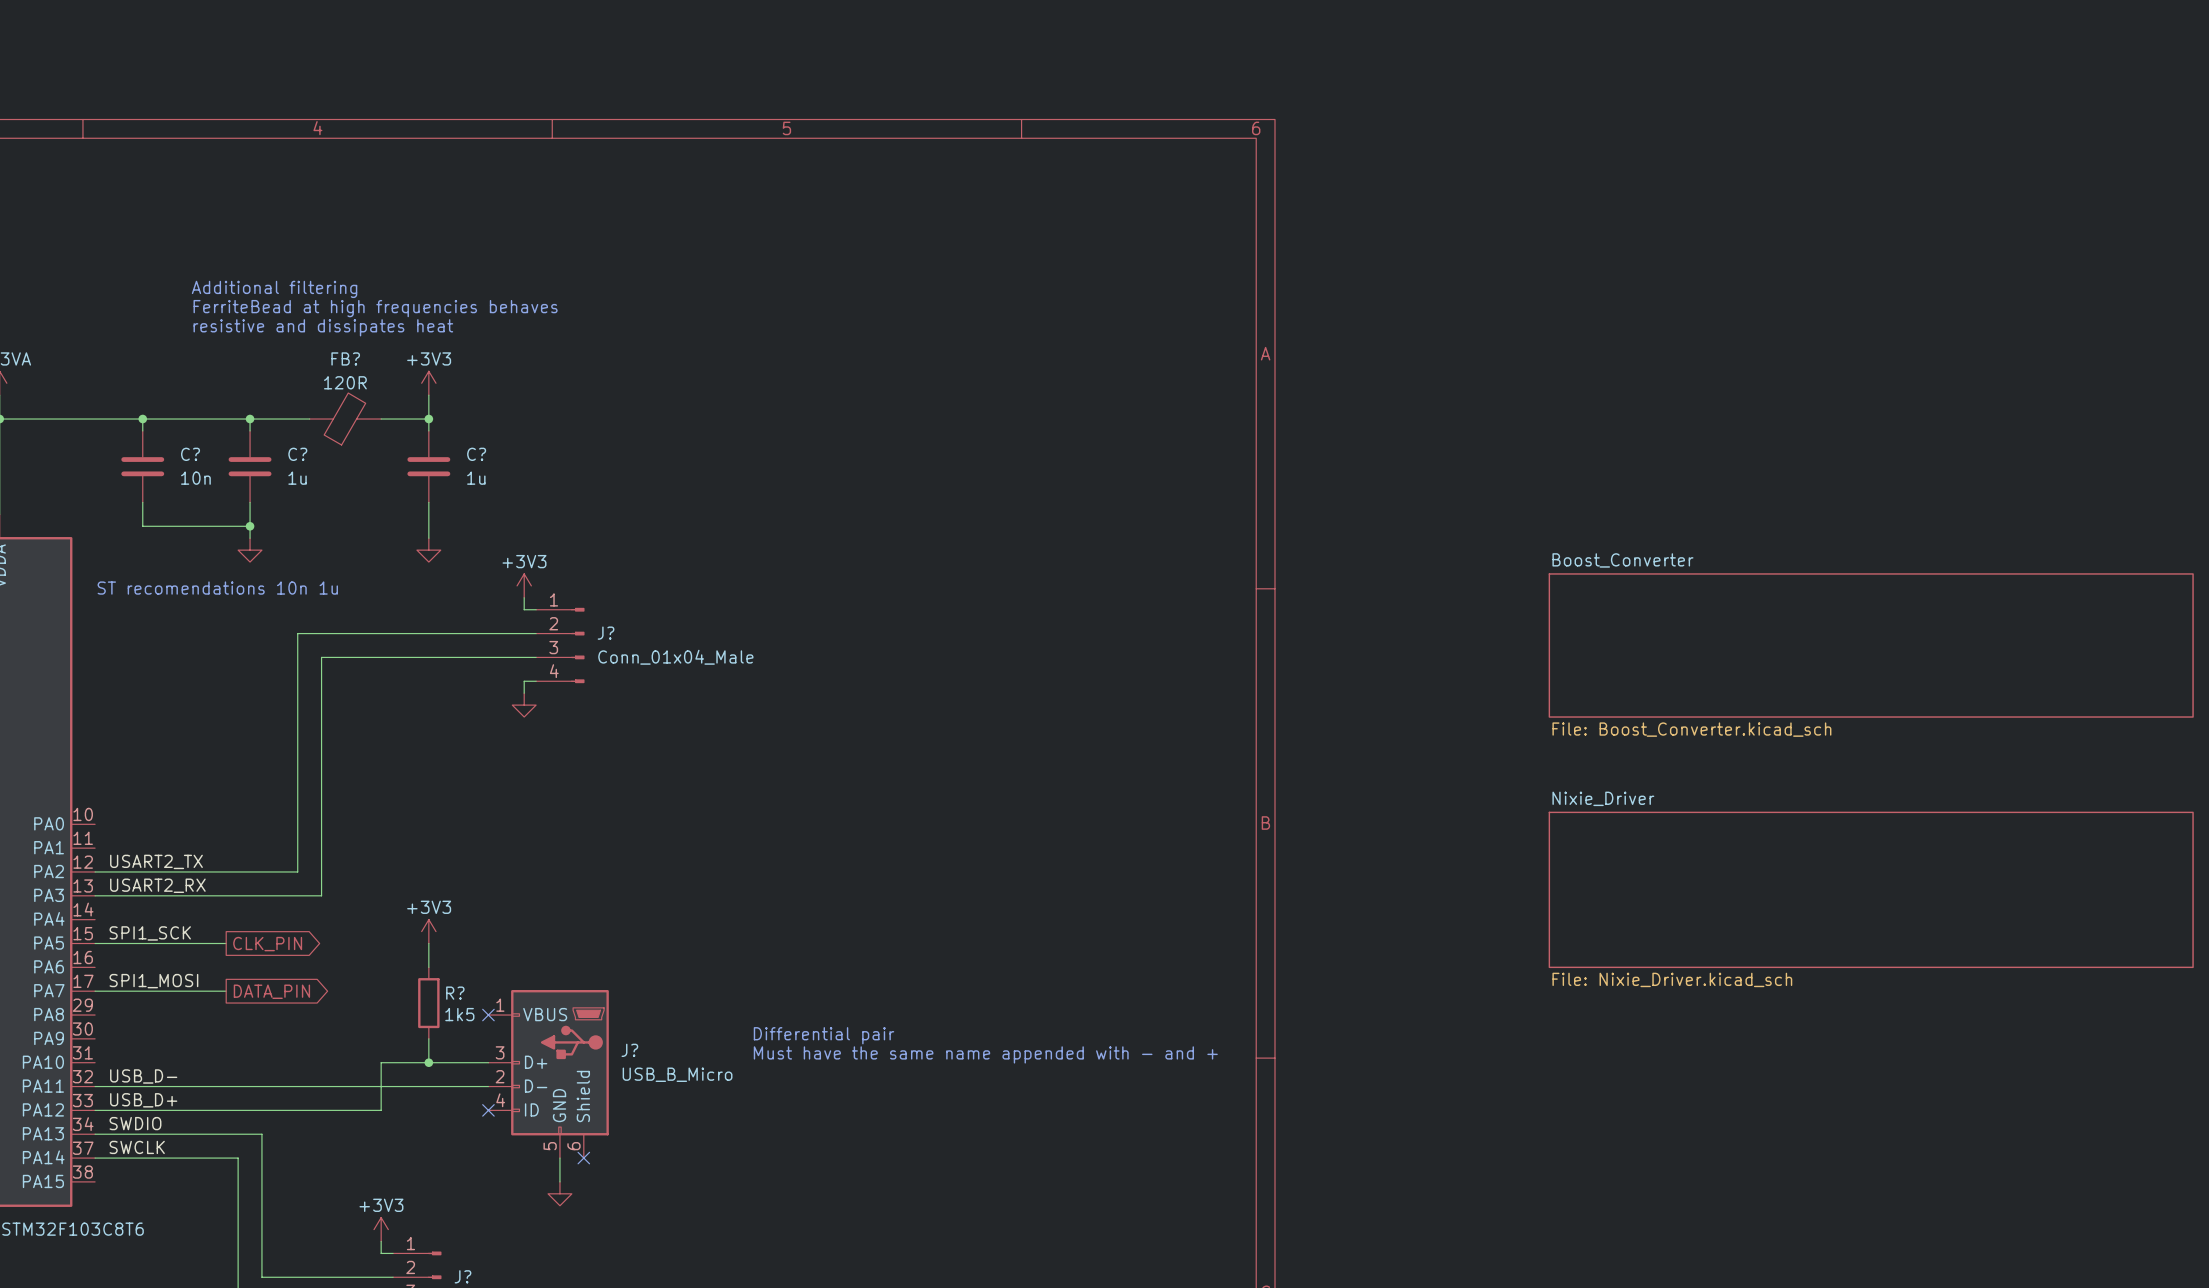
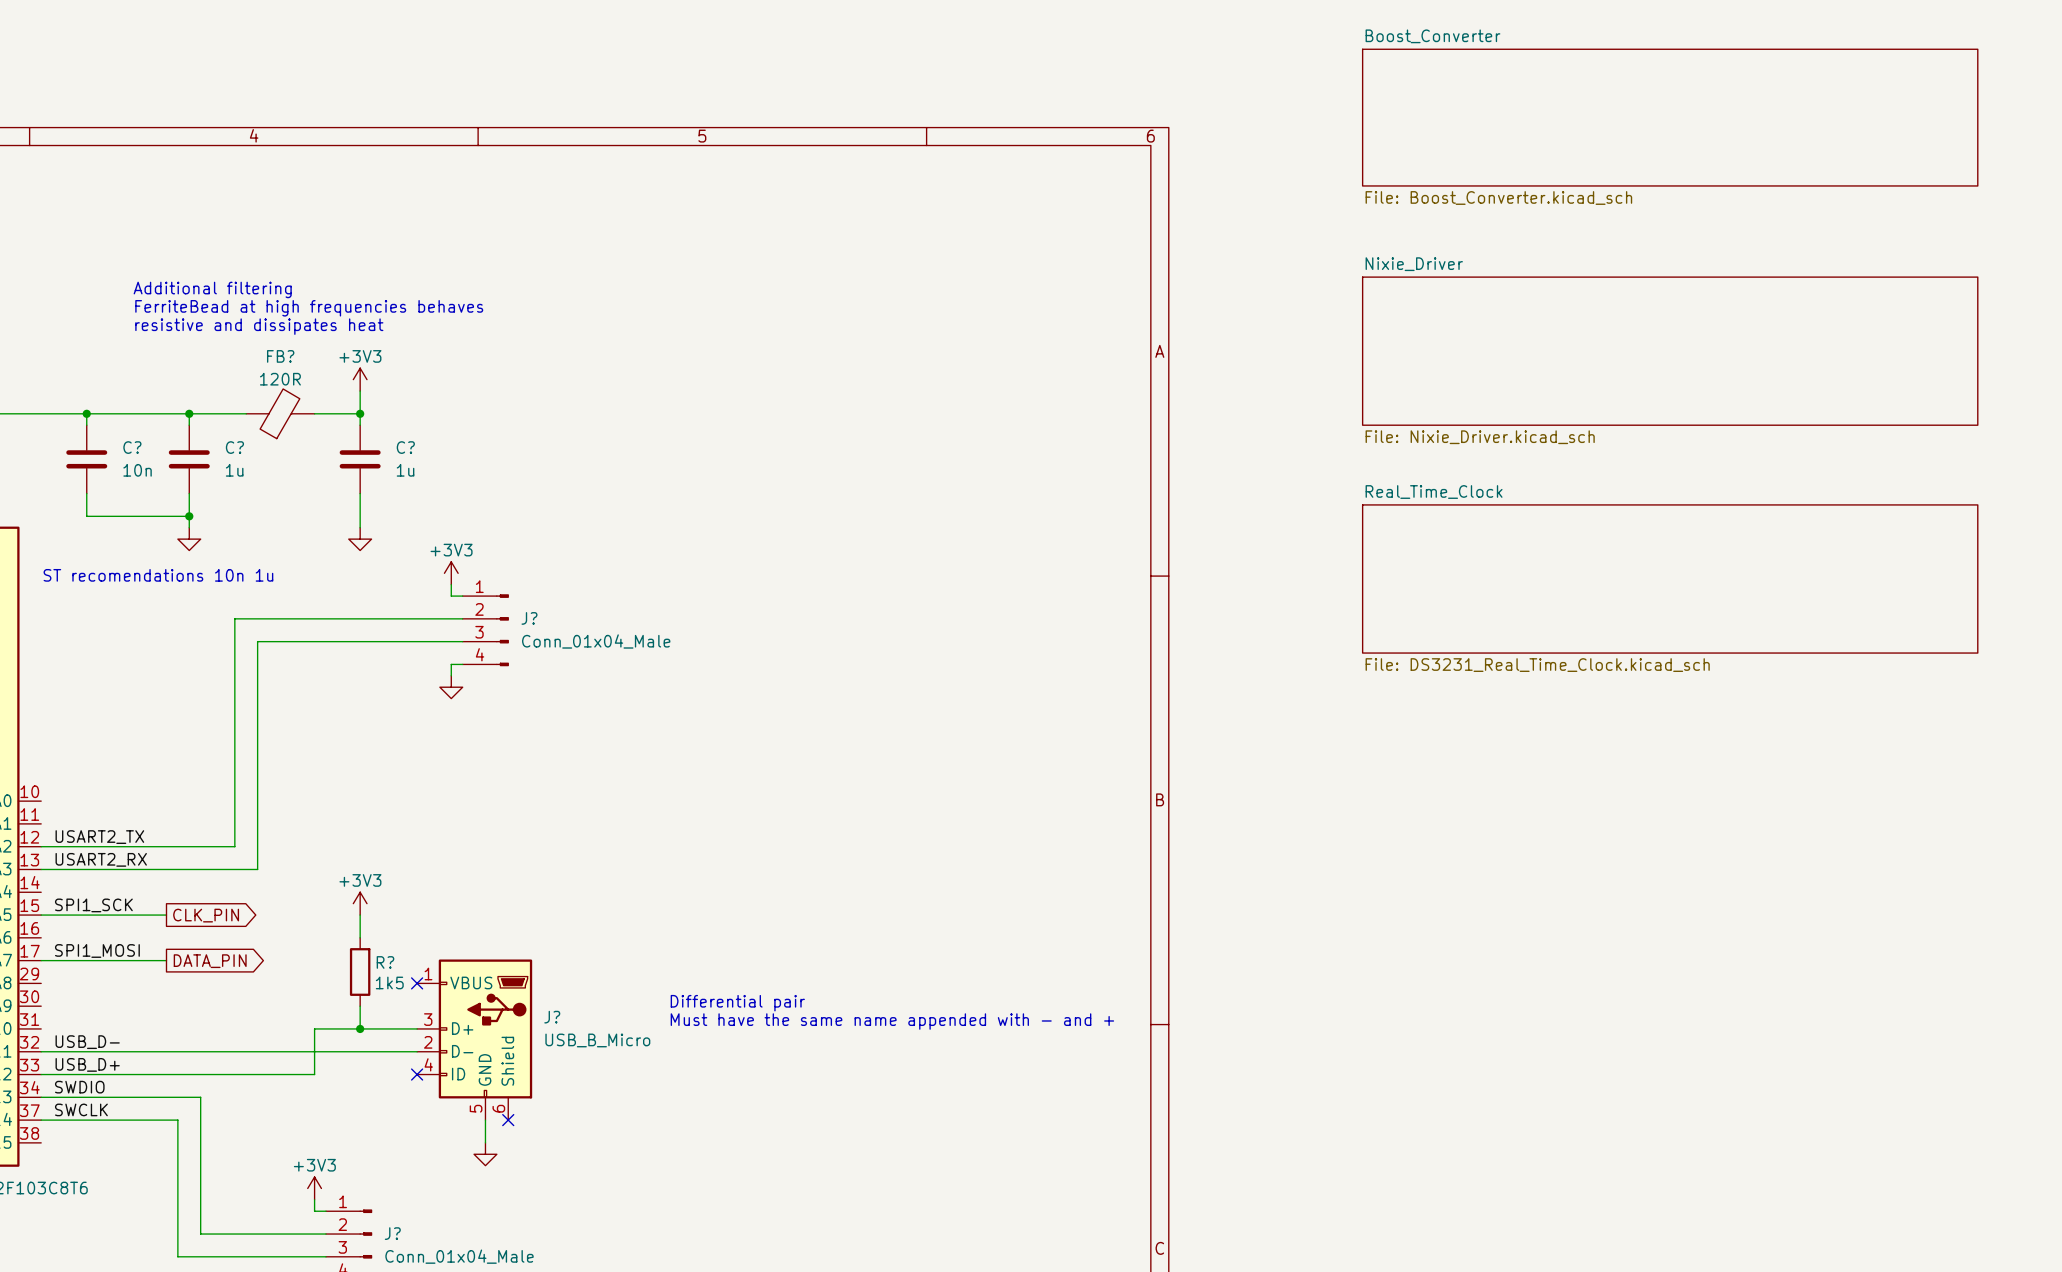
sheet Boost_Converter: none -> File: Boost_Converter.kicad_sch (1670, 117)
sheet Nixie_Driver: none -> File: Nixie_Driver.kicad_sch (1670, 351)
sheet Real_Time_Clock: none -> File: DS3231_Real_Time_Clock.kicad_sch (1670, 578)
sheet Boost_Converter: File: Boost_Converter.kicad_sch (1871, 645) -> none
sheet Nixie_Driver: File: Nixie_Driver.kicad_sch (1871, 889) -> none

